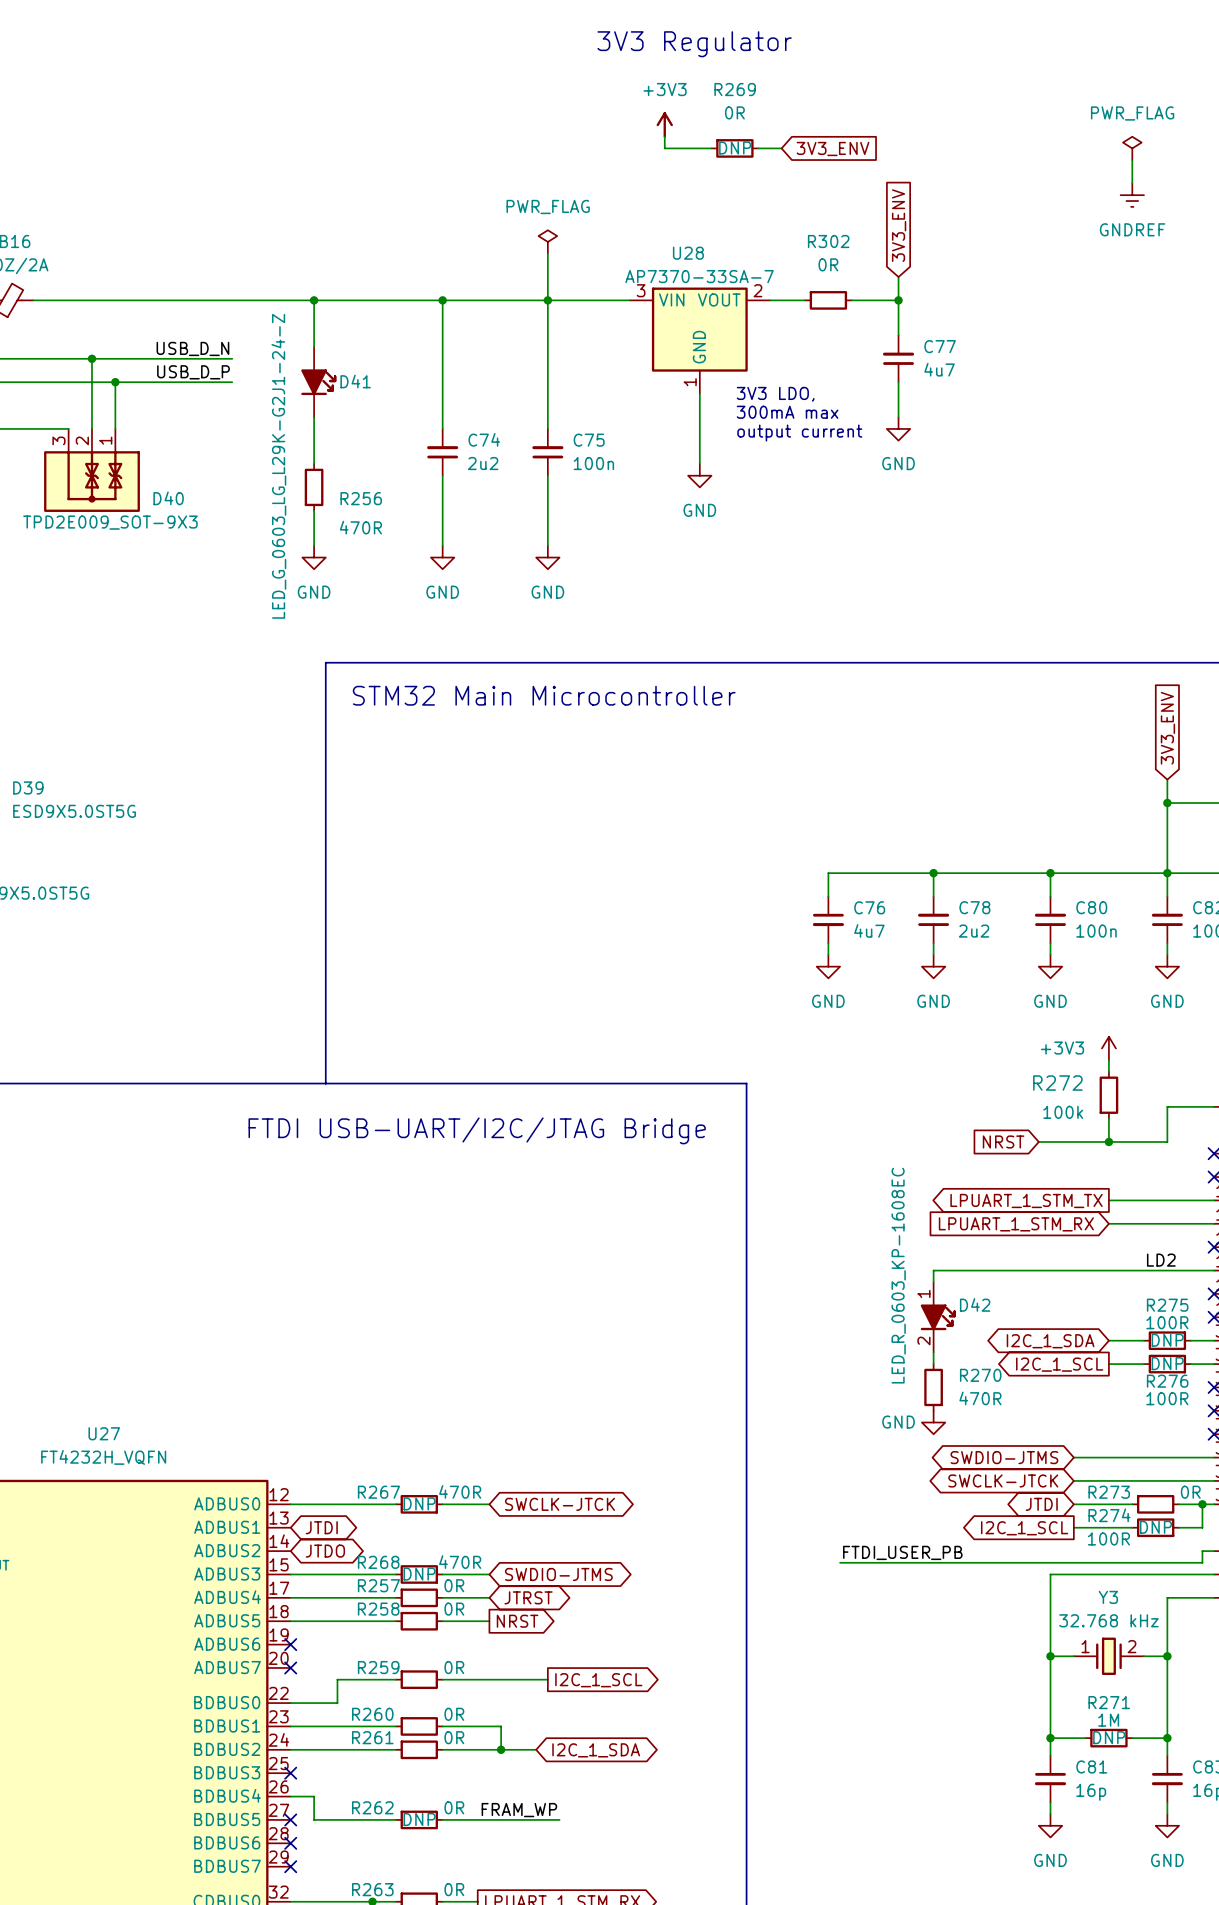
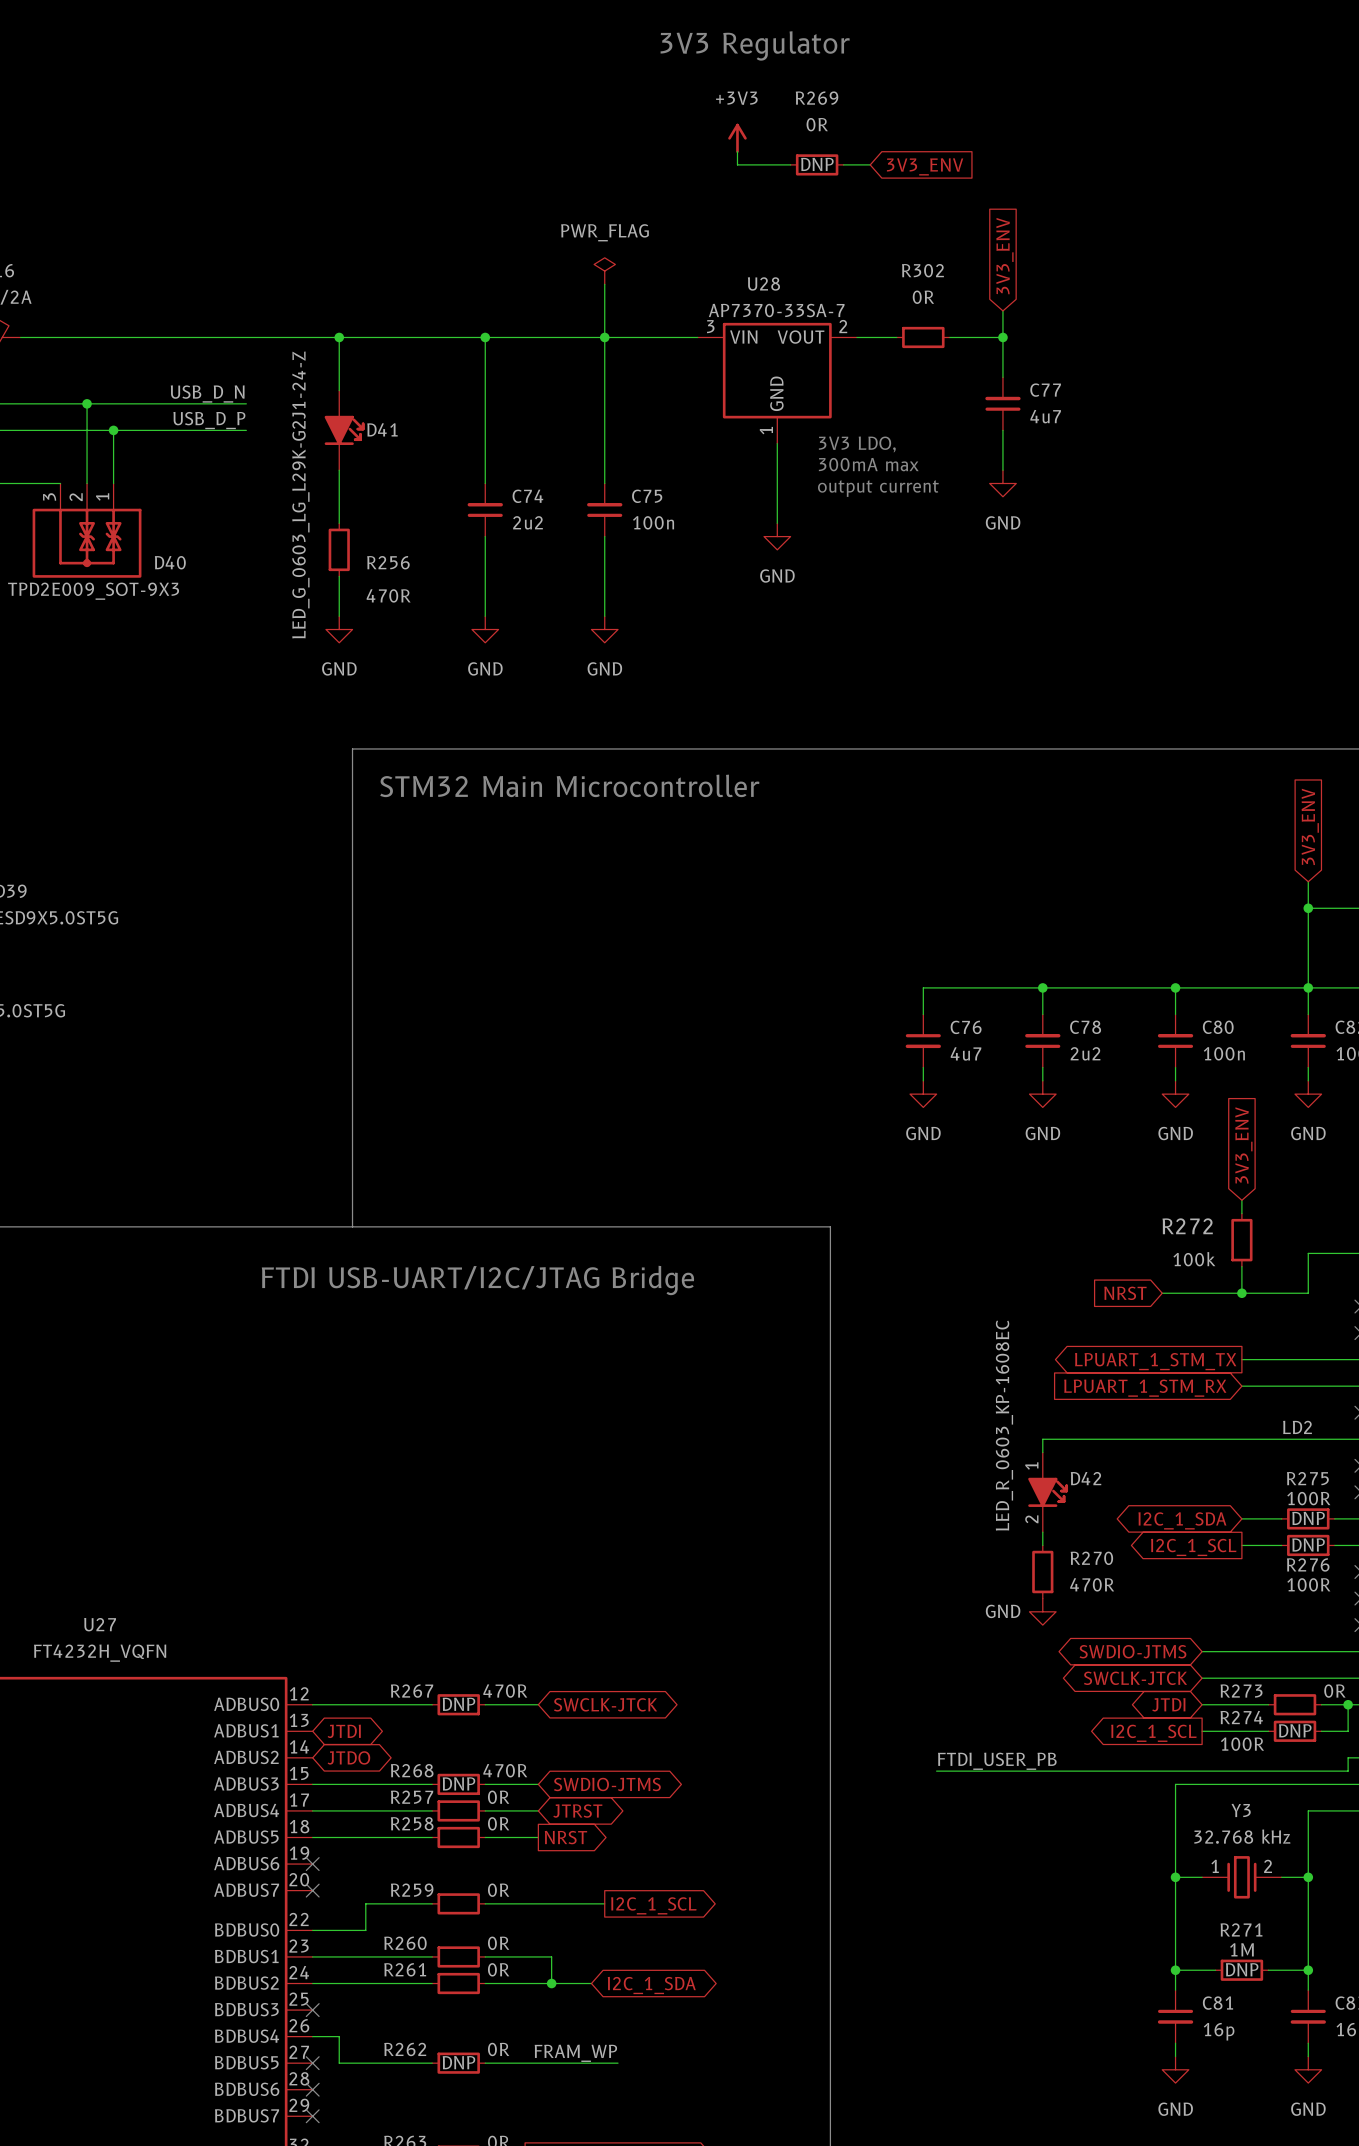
power symbol: PWR_FLAG (1132, 148) -> none
wire: (1132, 160) (1132, 183) -> none
power symbol: GNDREF (1132, 195) -> none
global label: none -> 3V3_ENV (1243, 1145)
power symbol: +3V3 (1108, 1048) -> none

